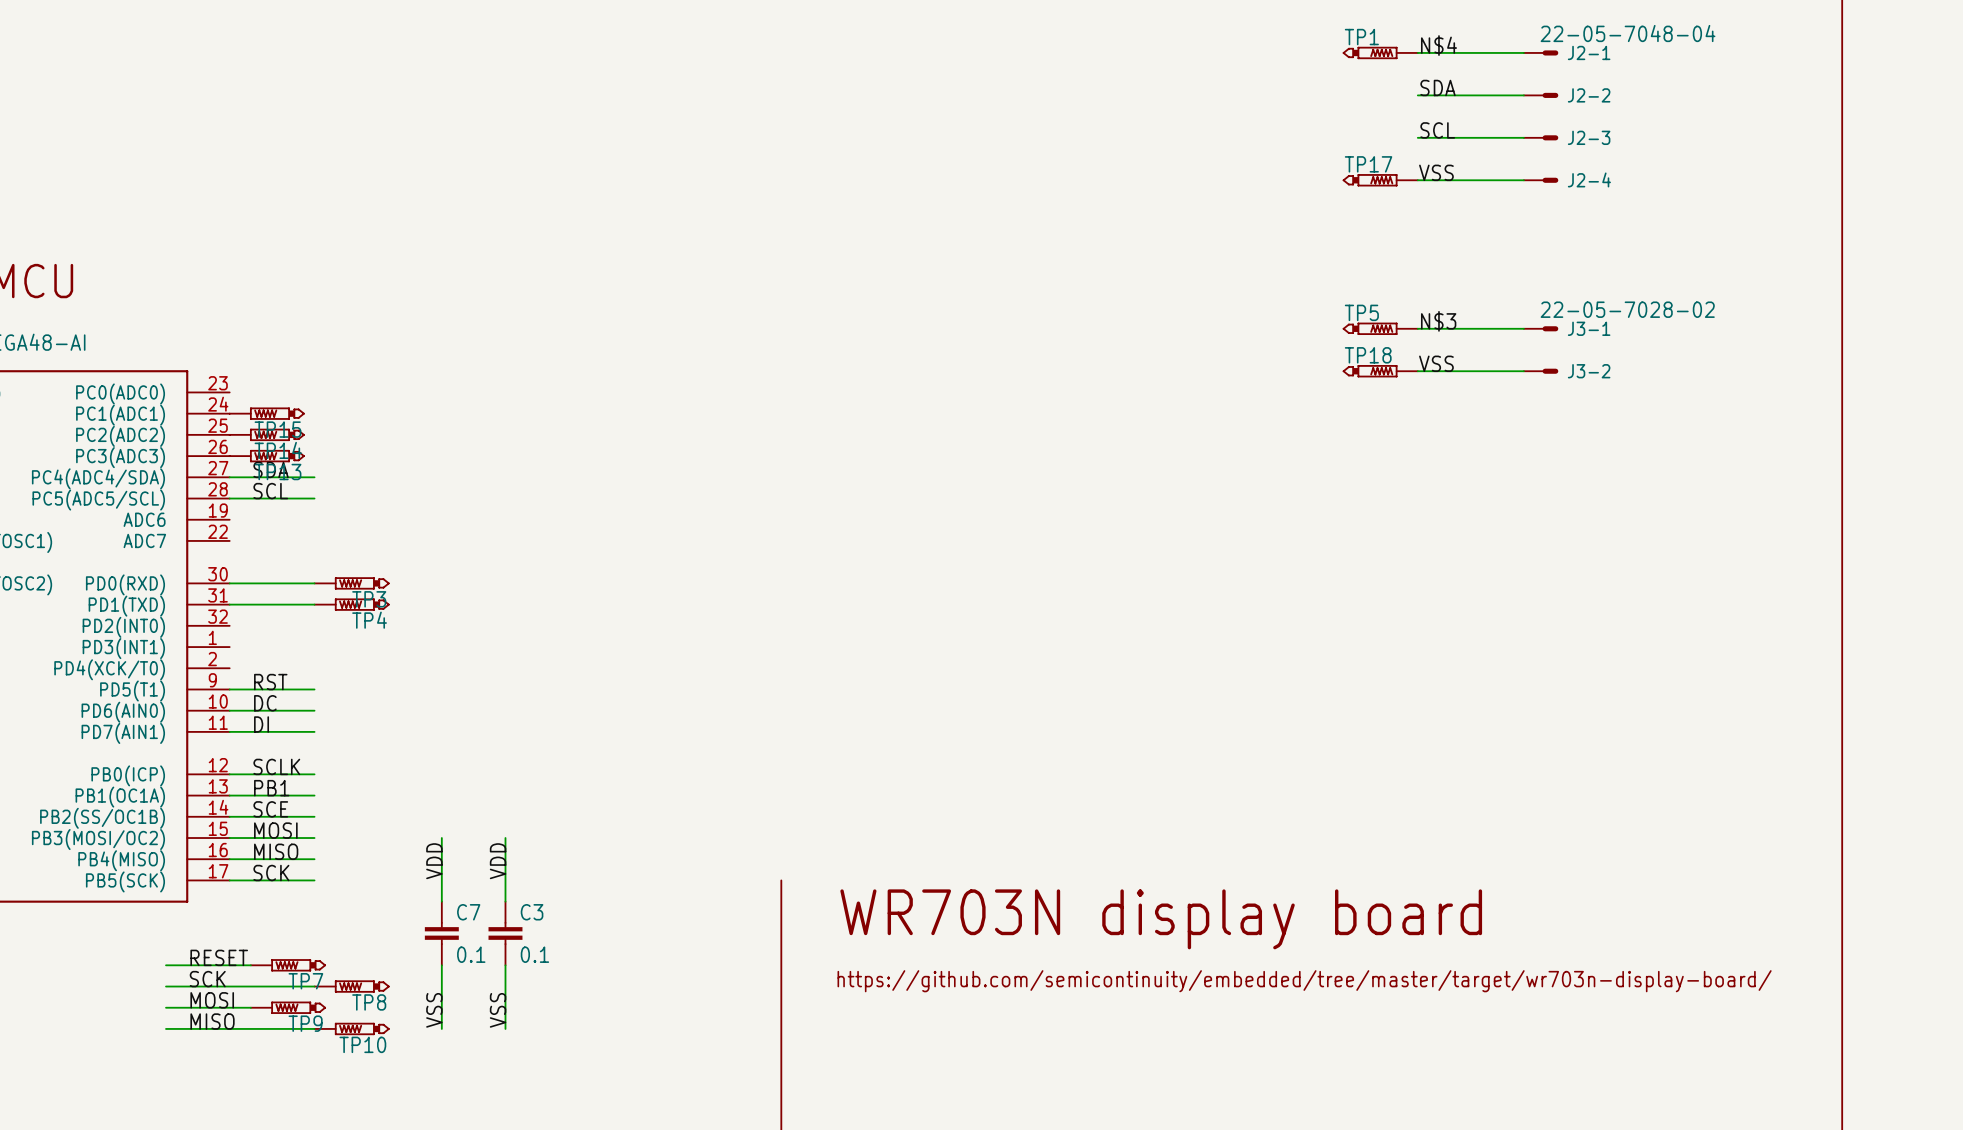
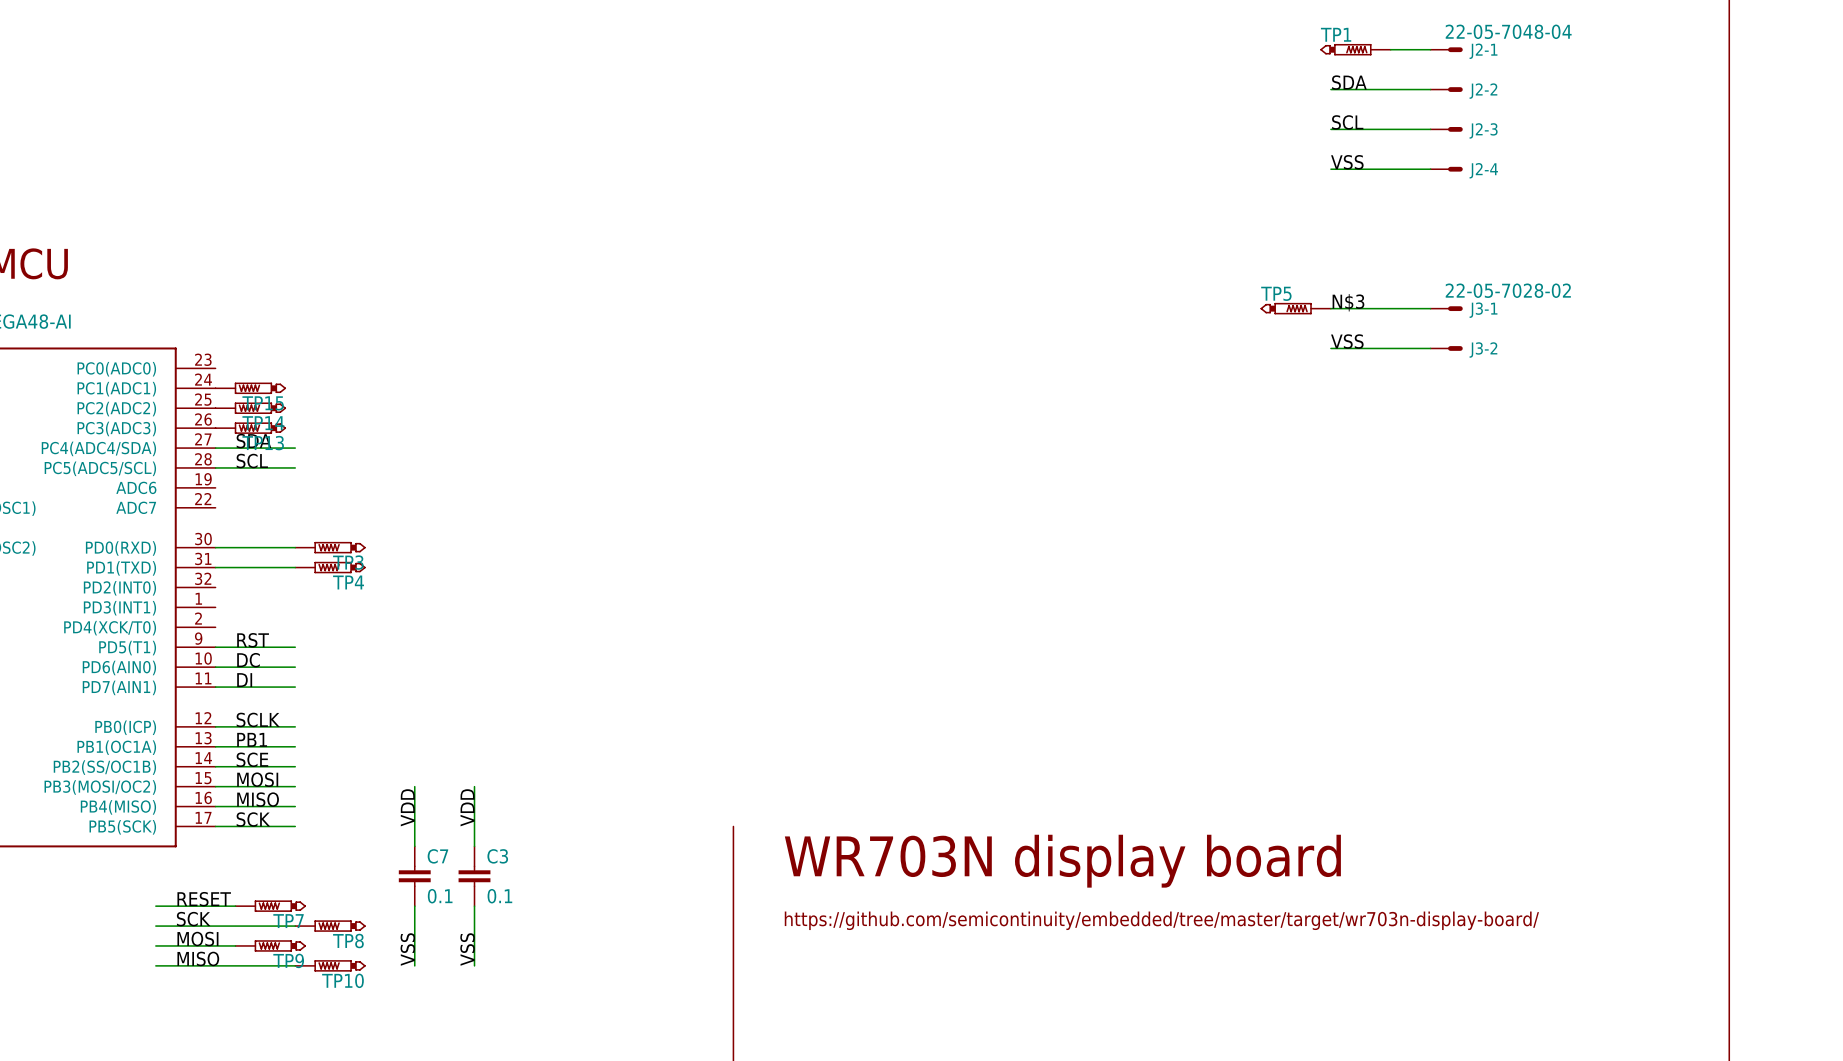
label: N$4 (1438, 45) -> none
TP1 position: (1380, 52) -> (1355, 49)
TP17: (1380, 180) -> none
TP18: (1380, 371) -> none

